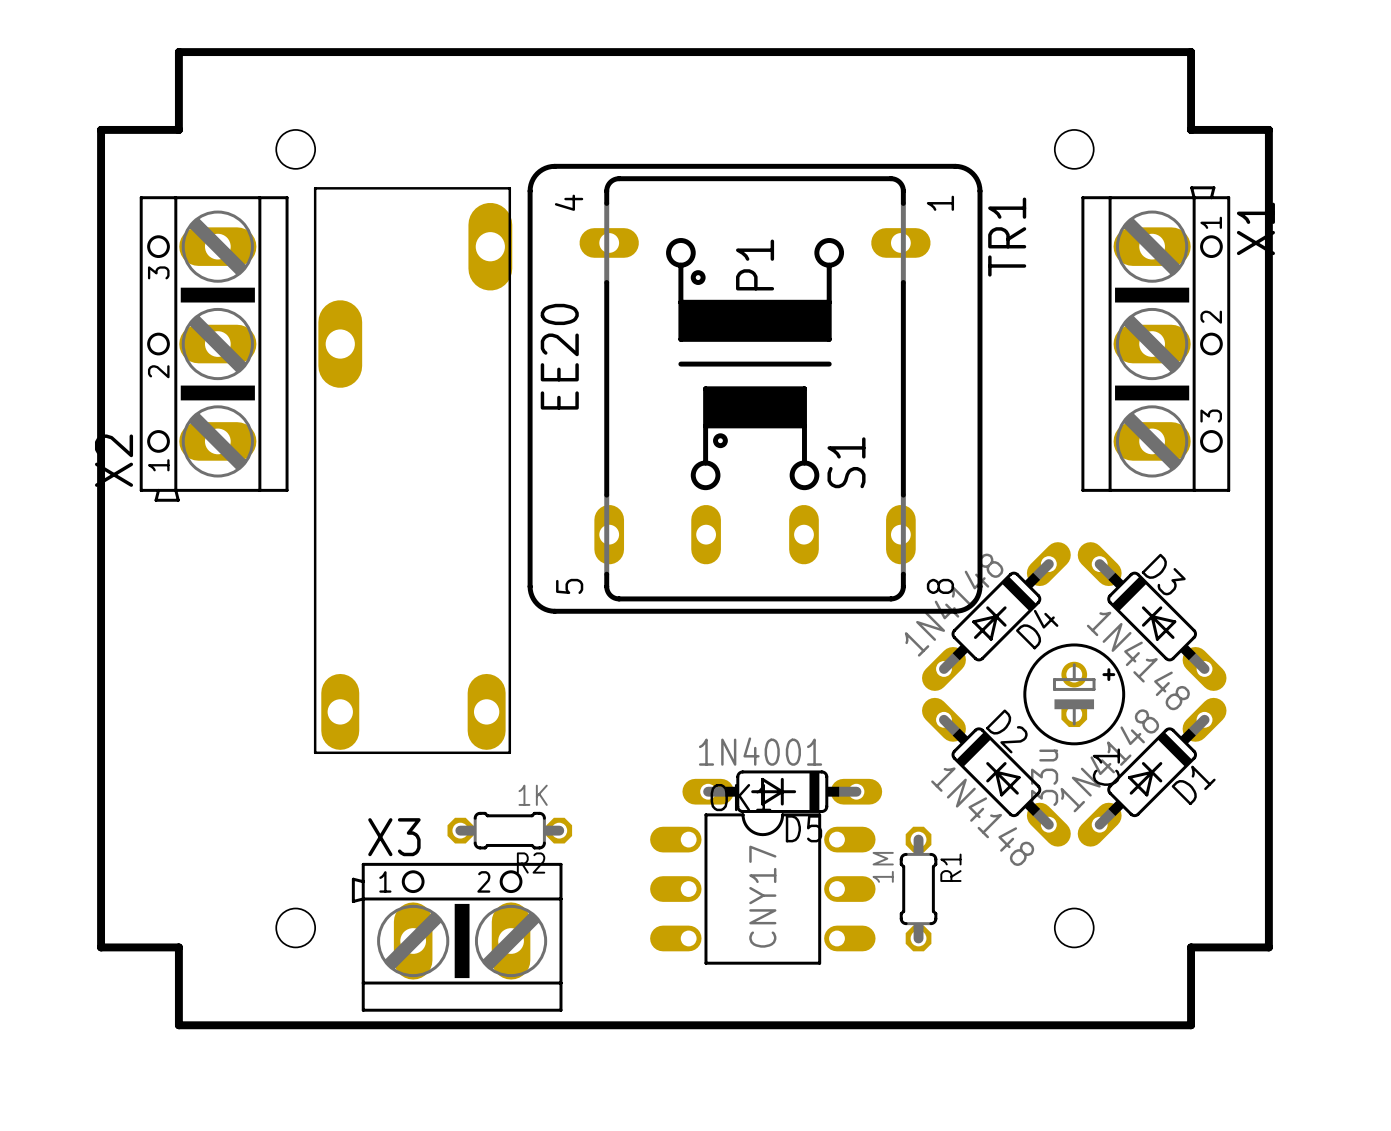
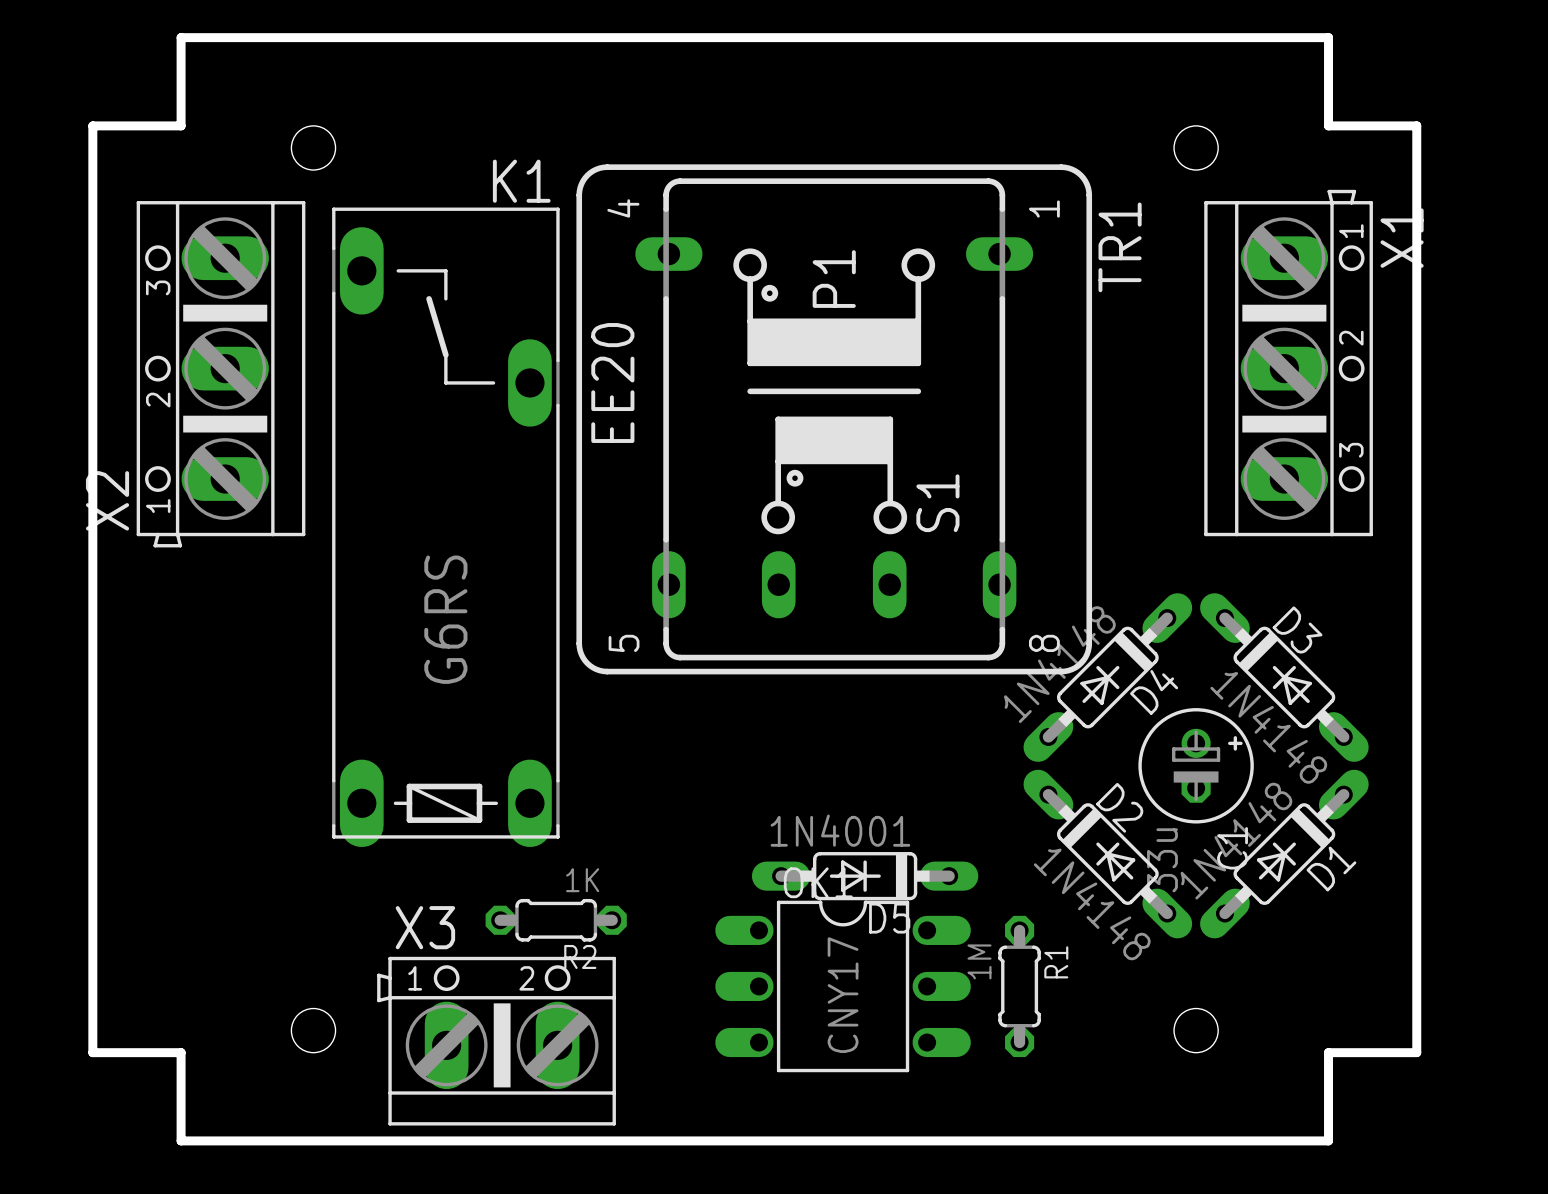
part: (413, 470) -> none
K1: none -> G6RS (445, 527)

